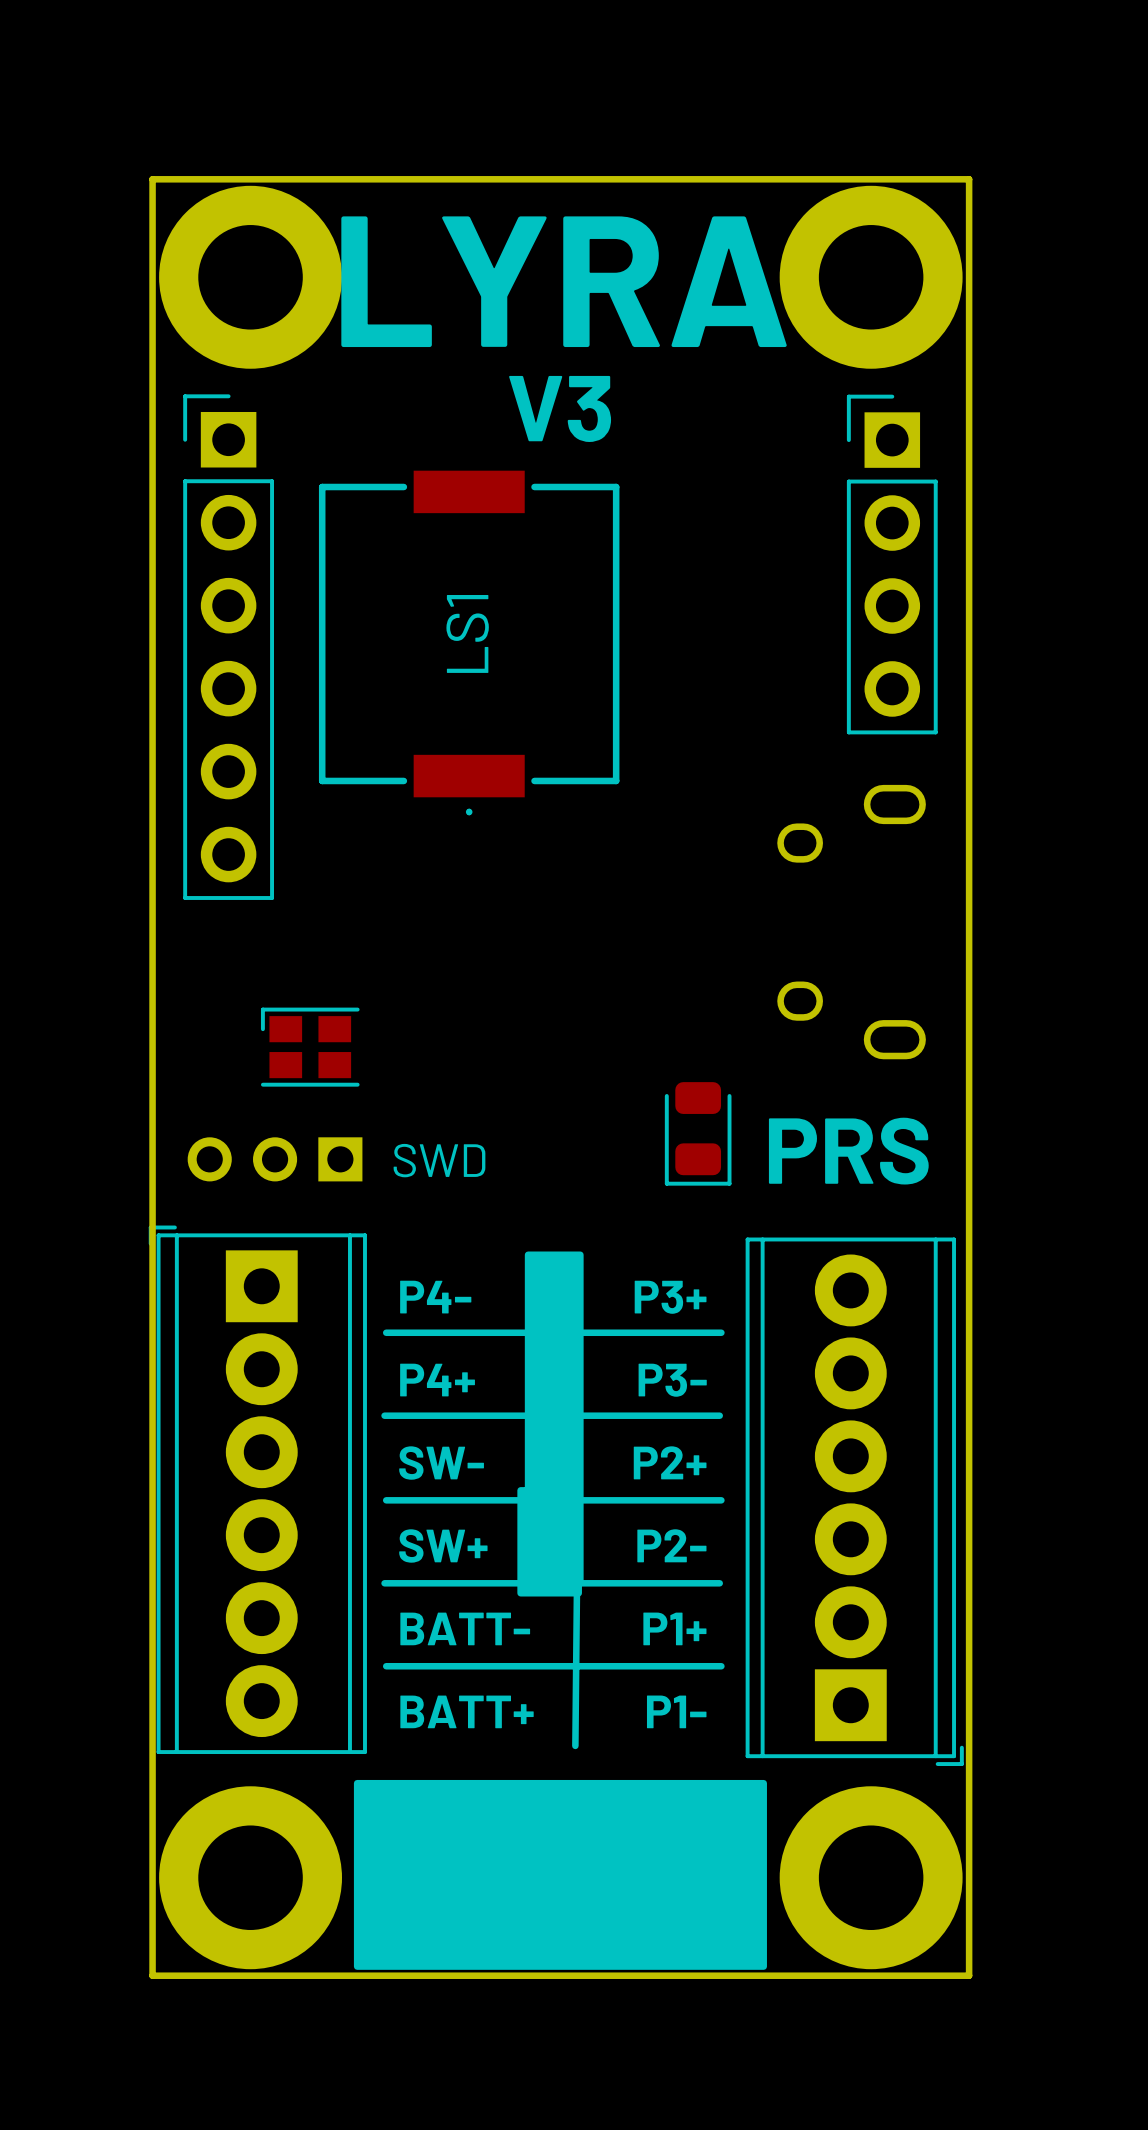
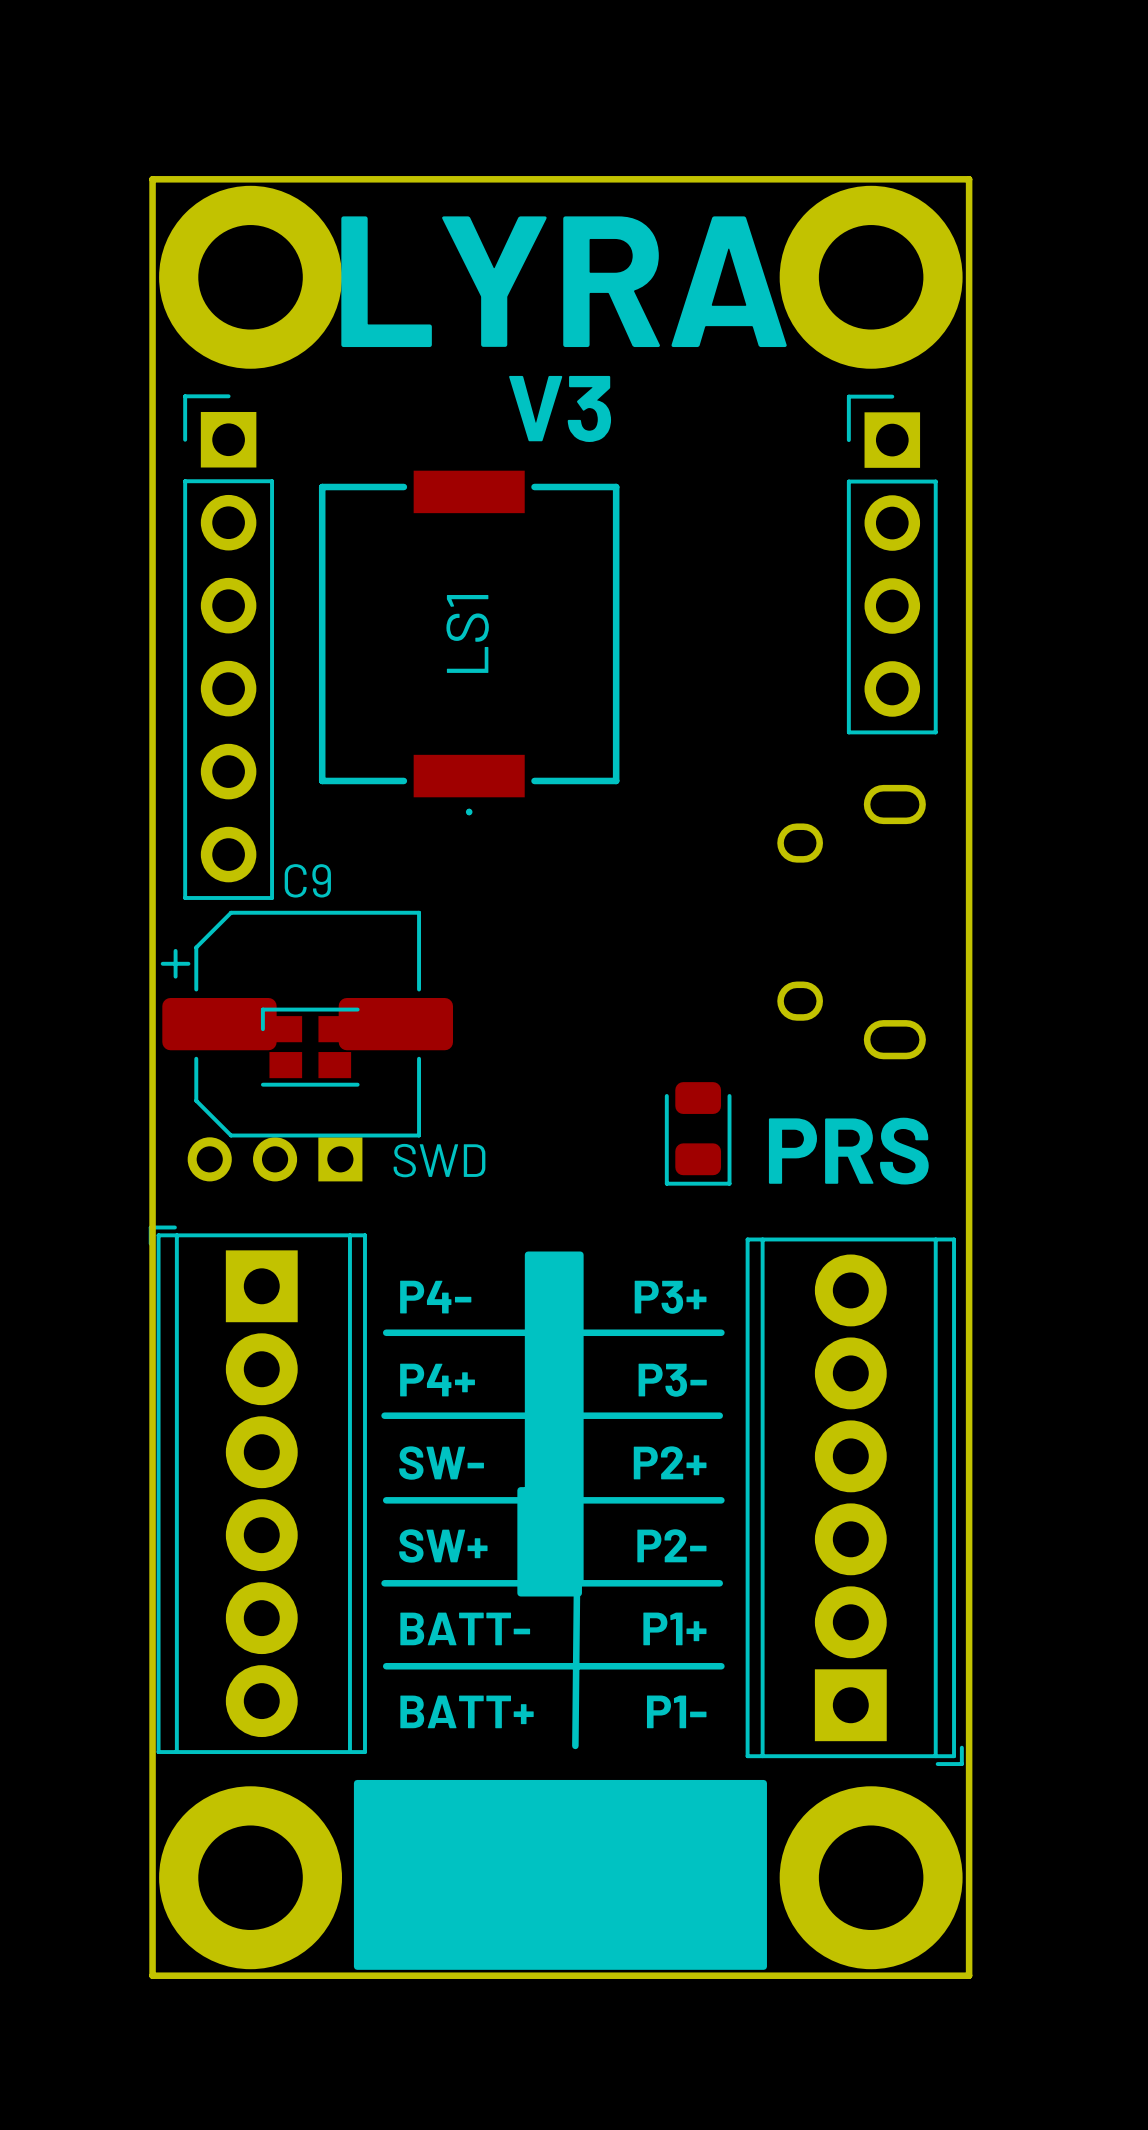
C9: none -> (306, 1024)

